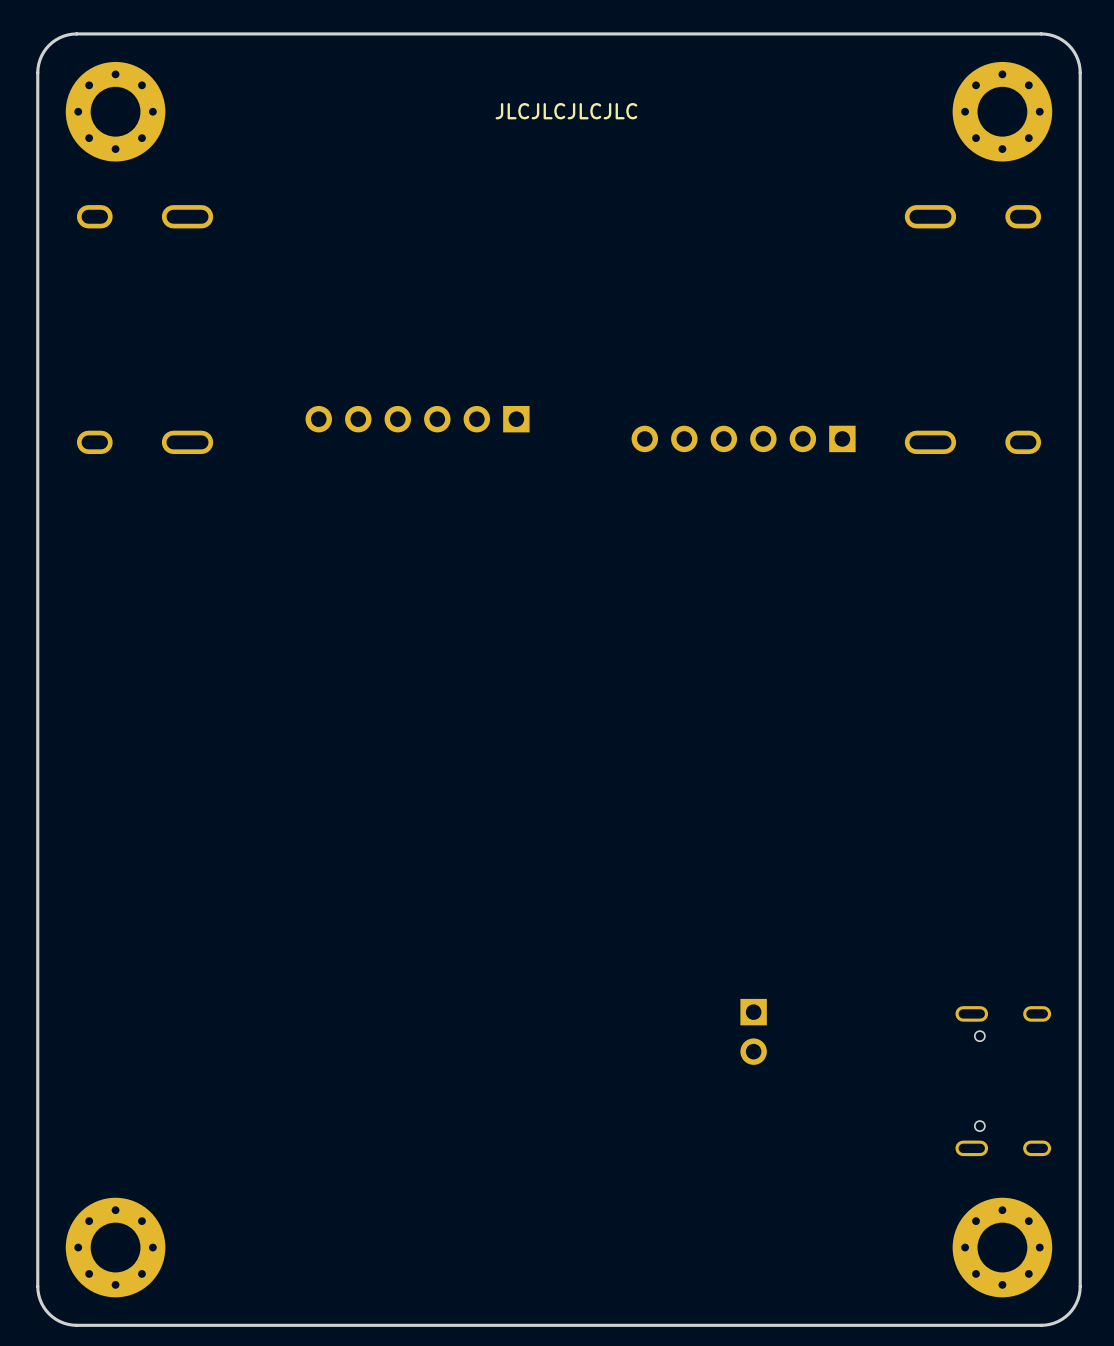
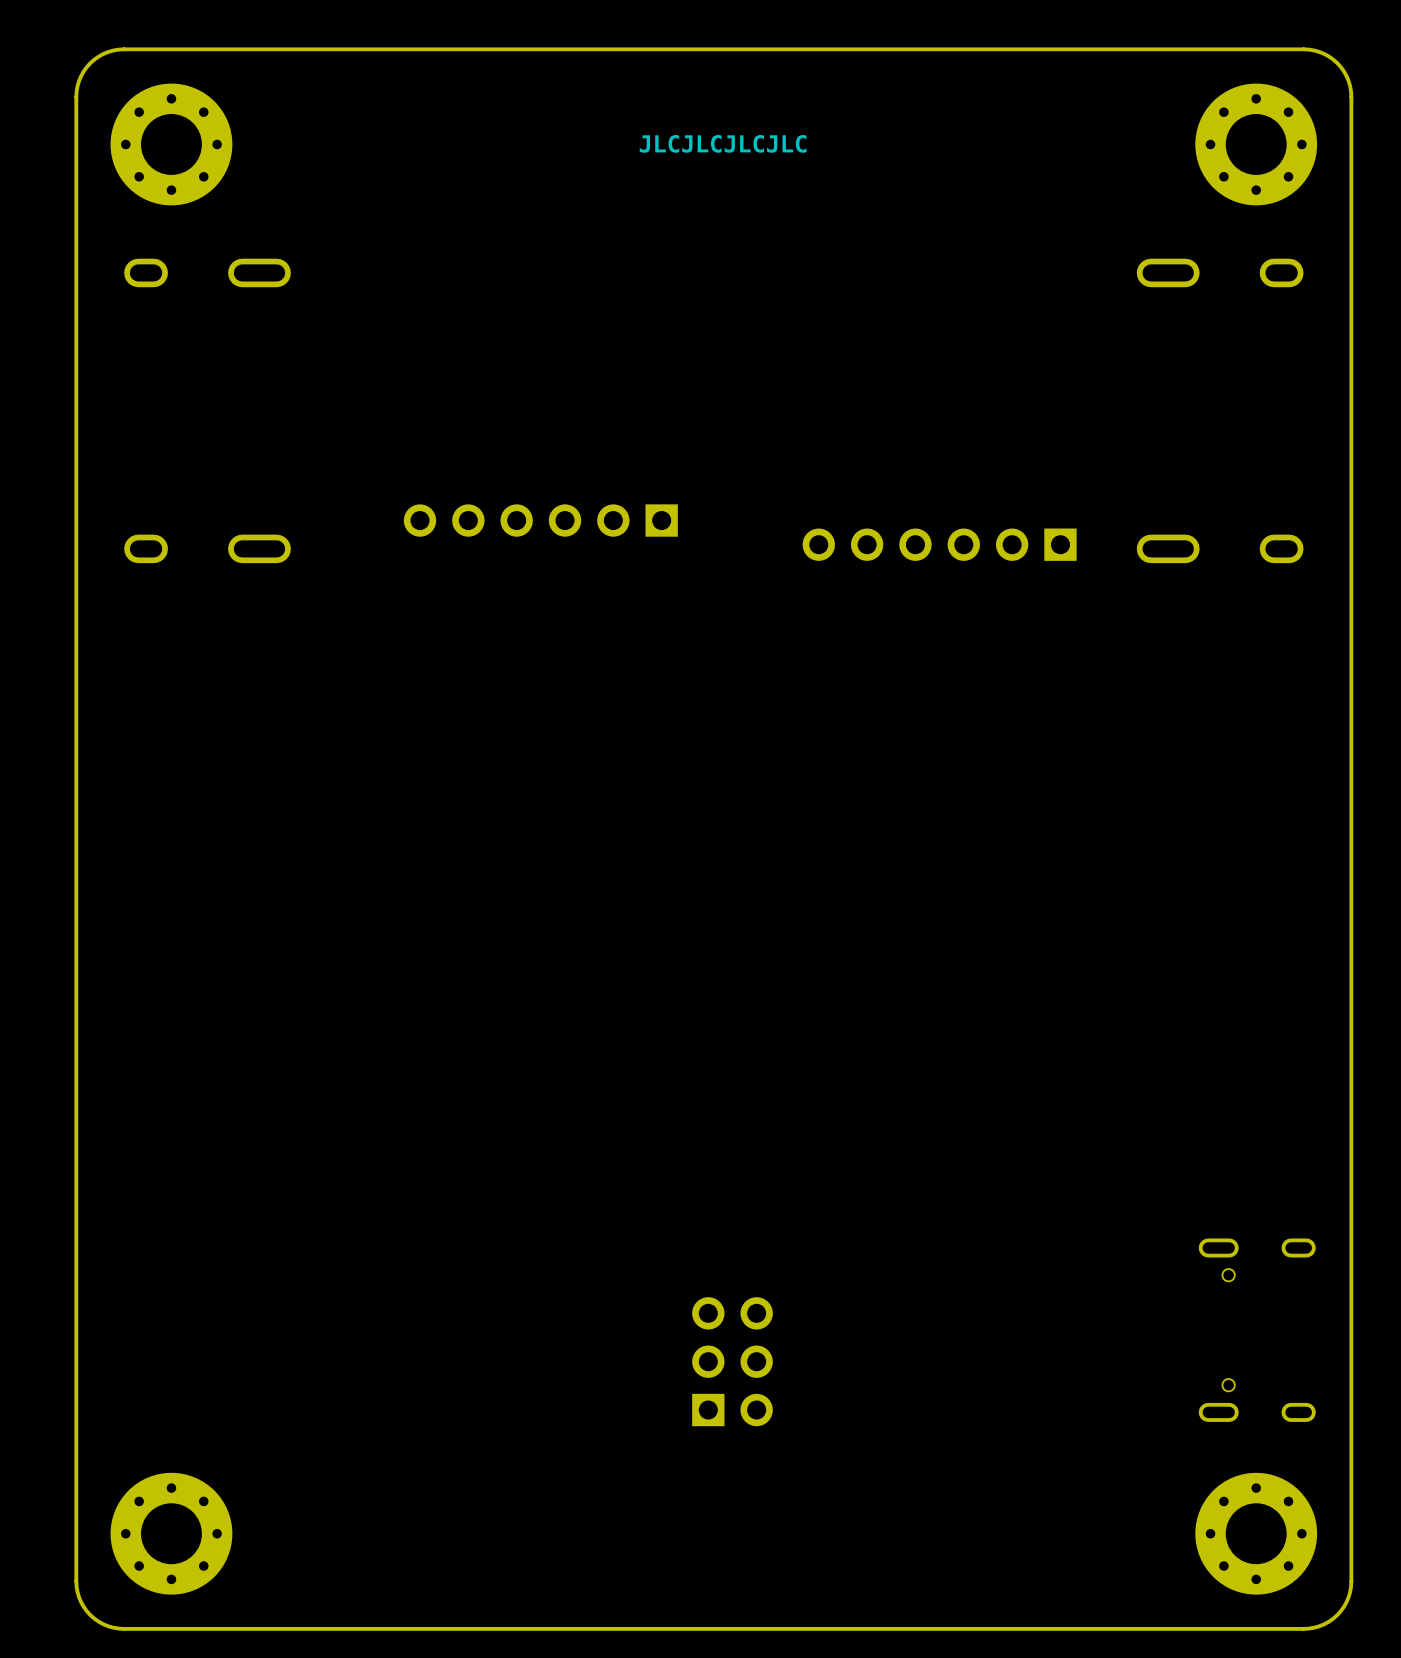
part: (753, 1031) -> none
part: none -> (732, 1361)

